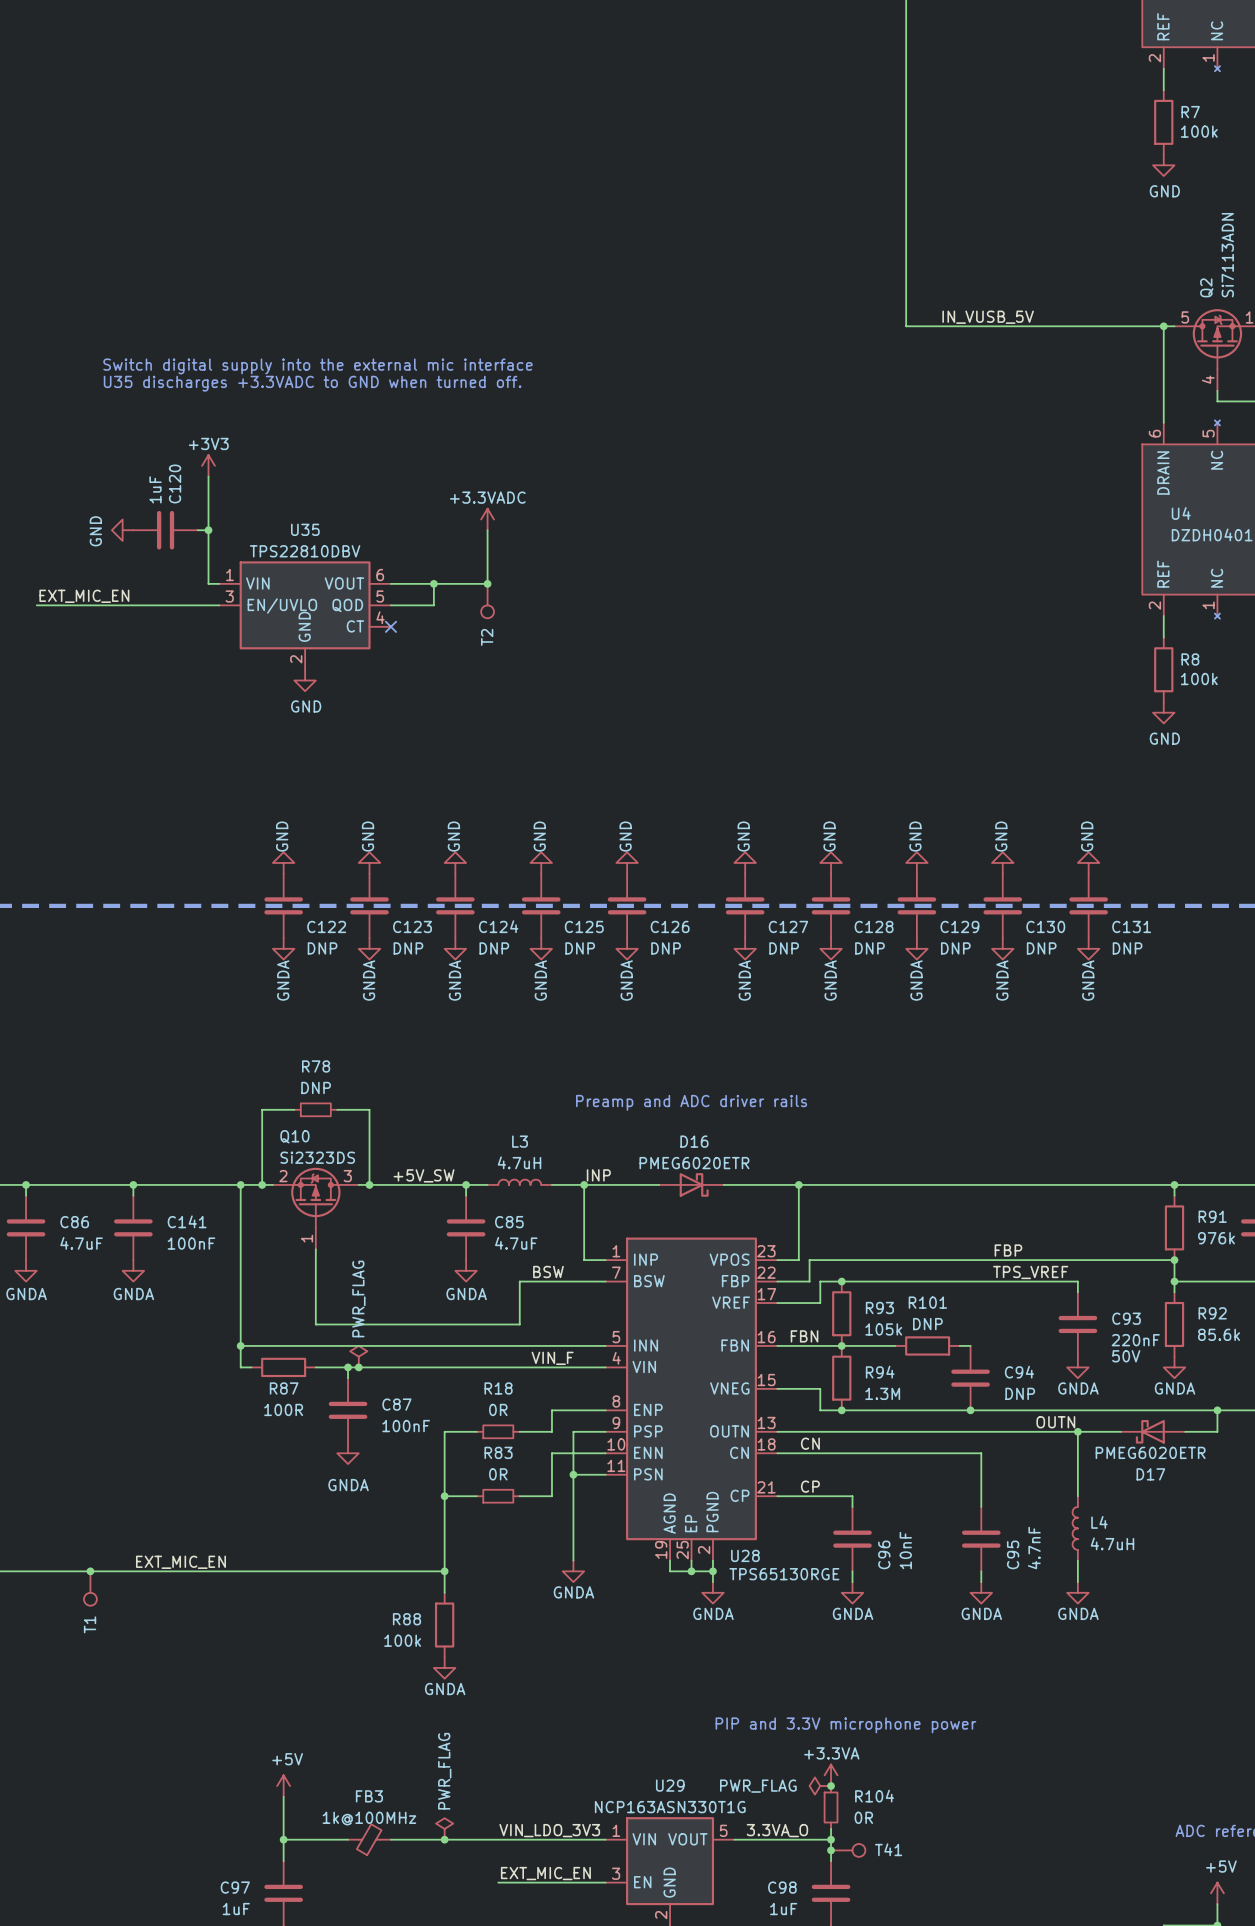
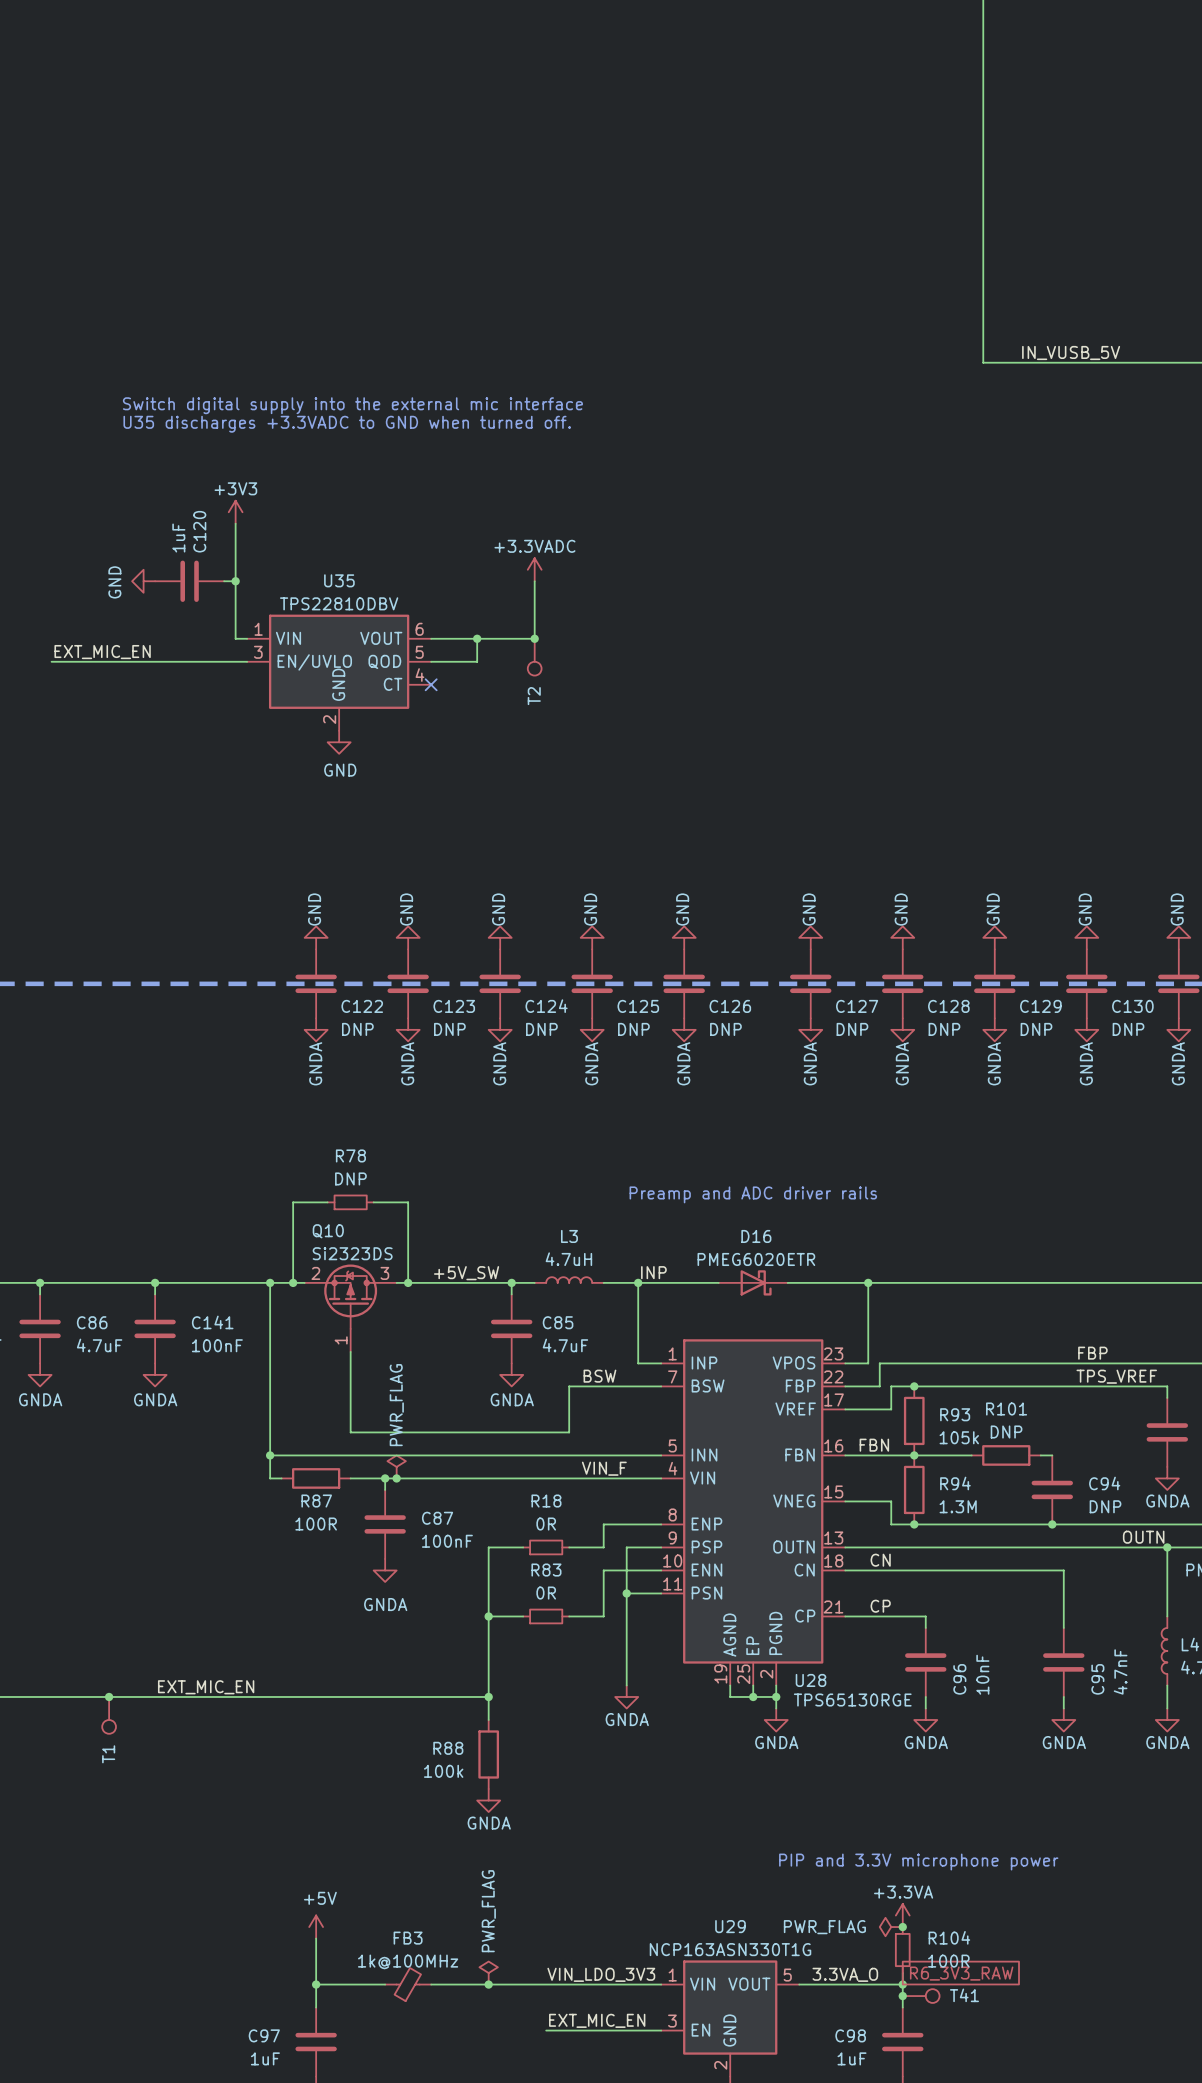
R104 value: 0R (863, 1817) -> 100R (948, 1961)
global label: none -> R6_3V3_RAW (961, 1973)

